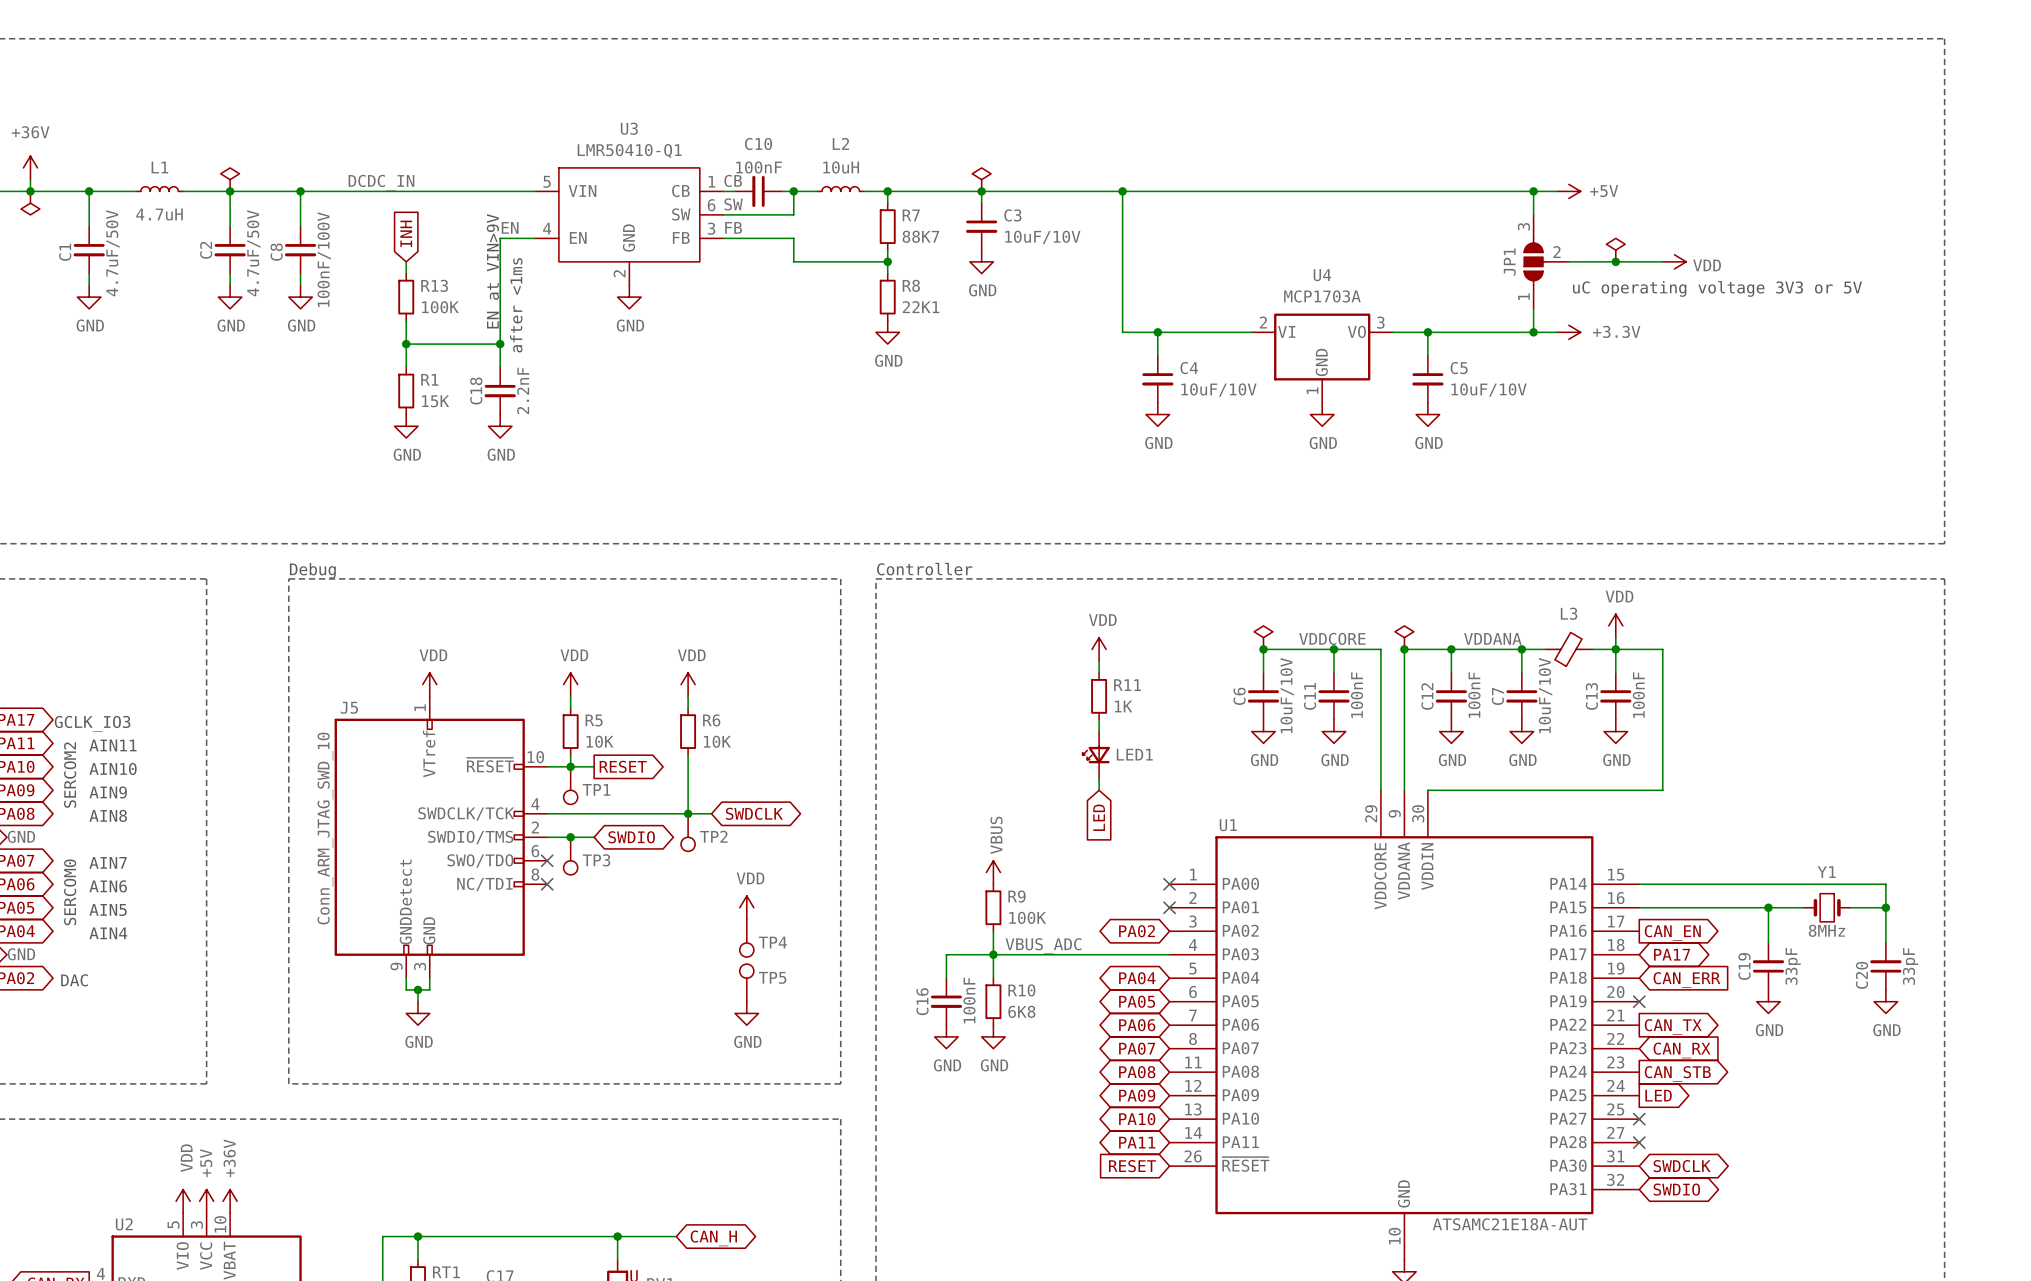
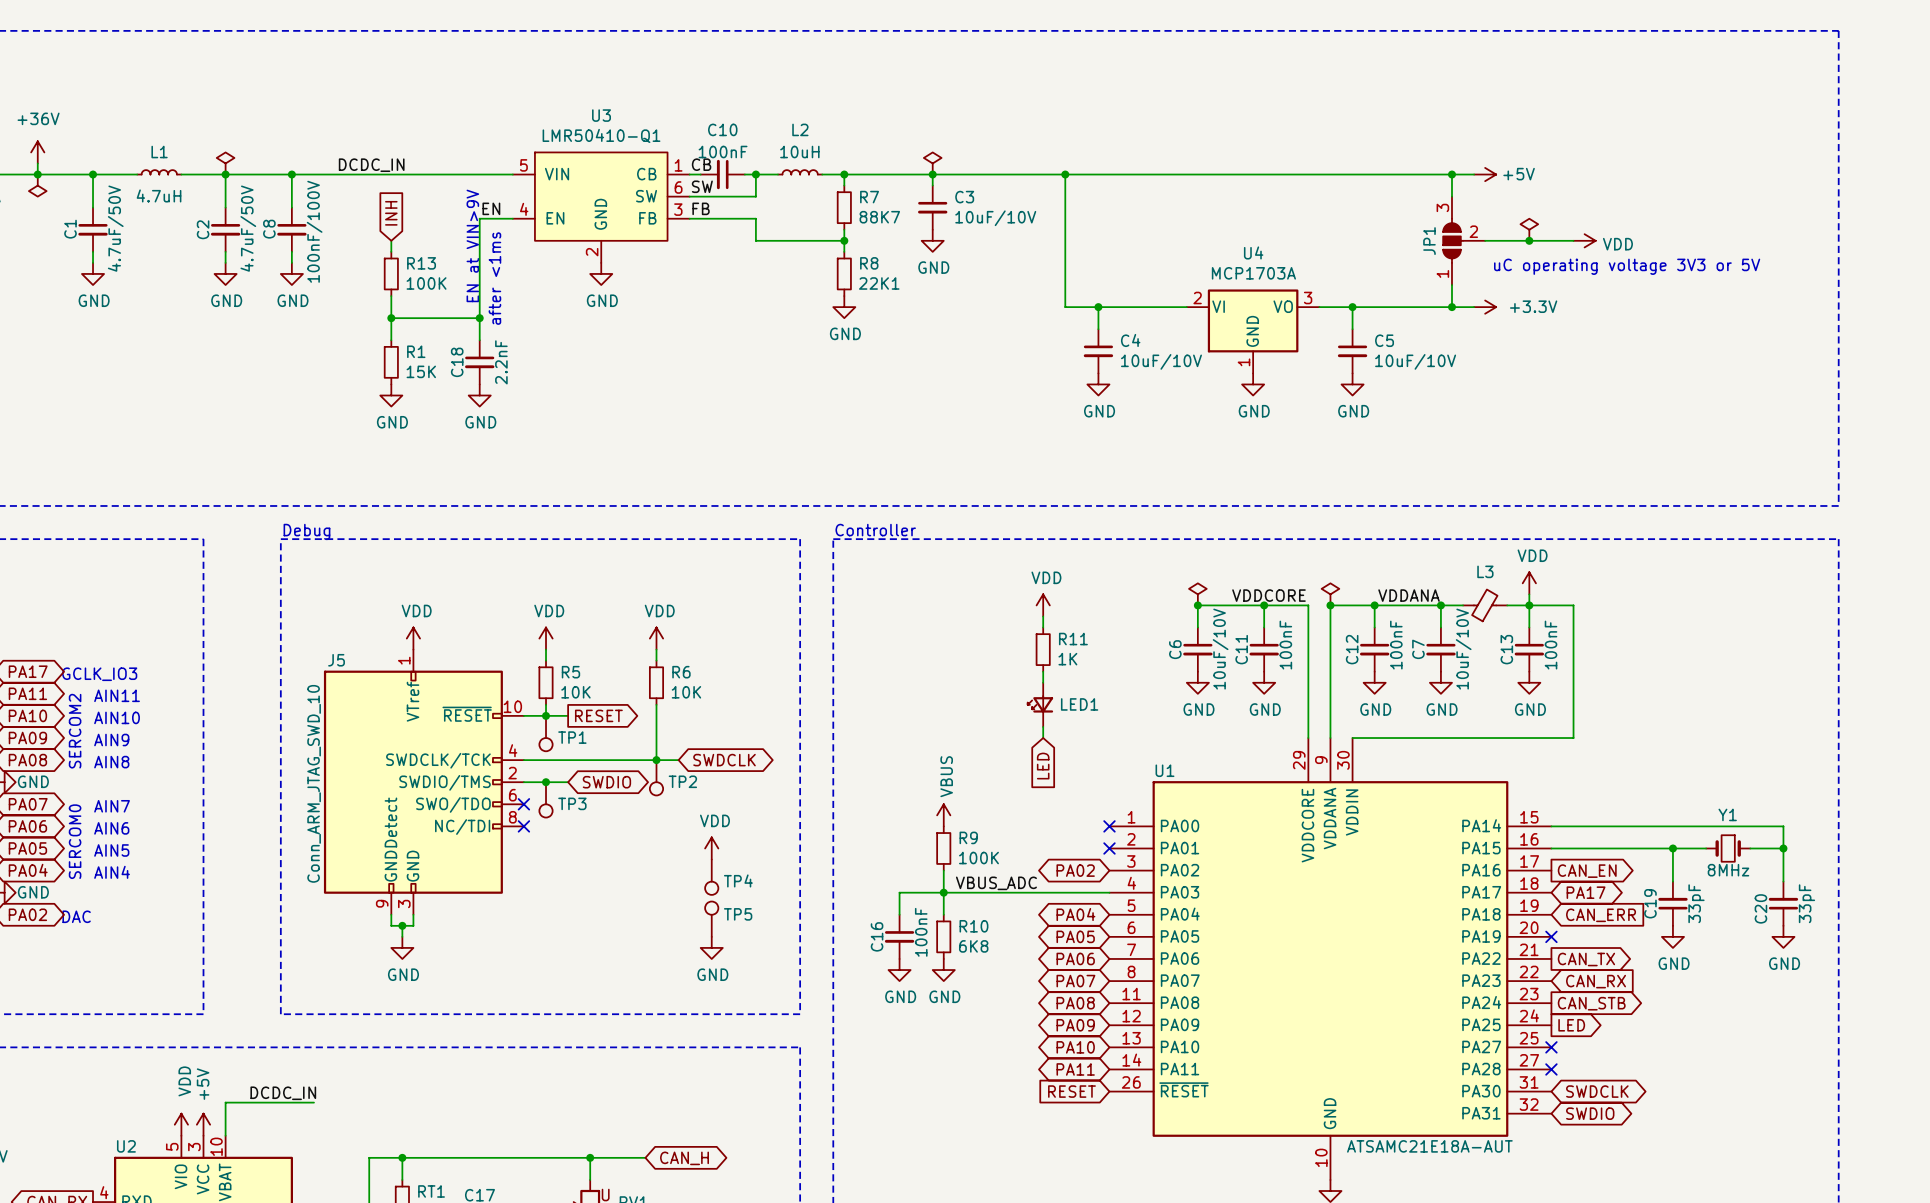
label: none -> DCDC_IN (283, 1093)
wire: none -> (313, 1102) (225, 1102) (225, 1135)
power symbol: +36V (230, 1201) -> none

